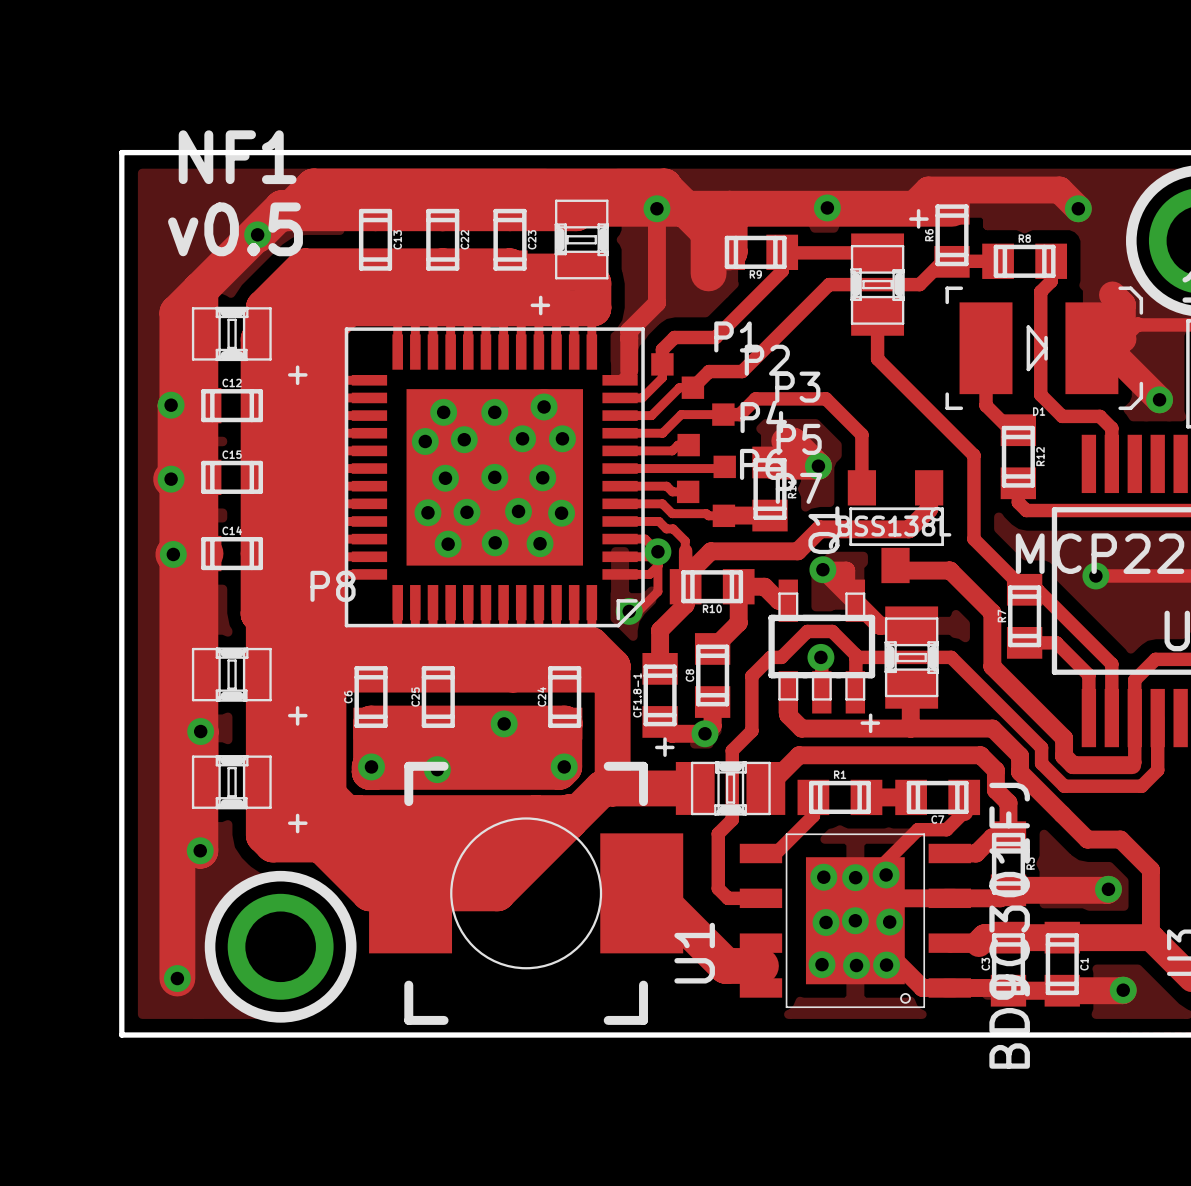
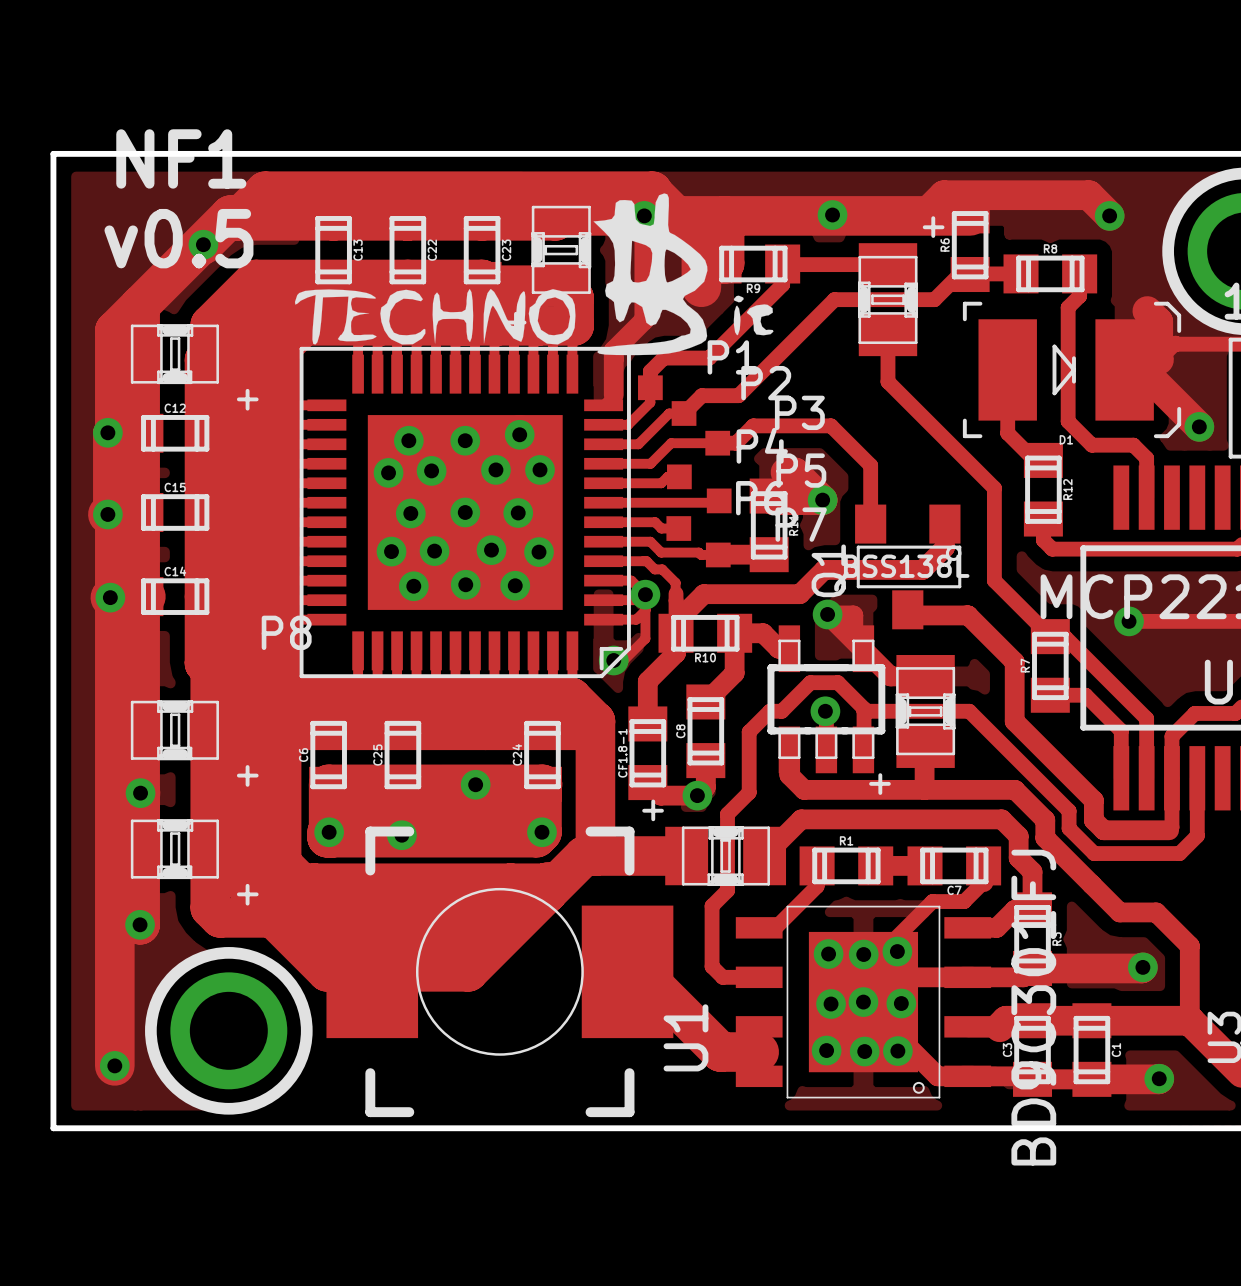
drawing: none -> [294, 193, 774, 356]

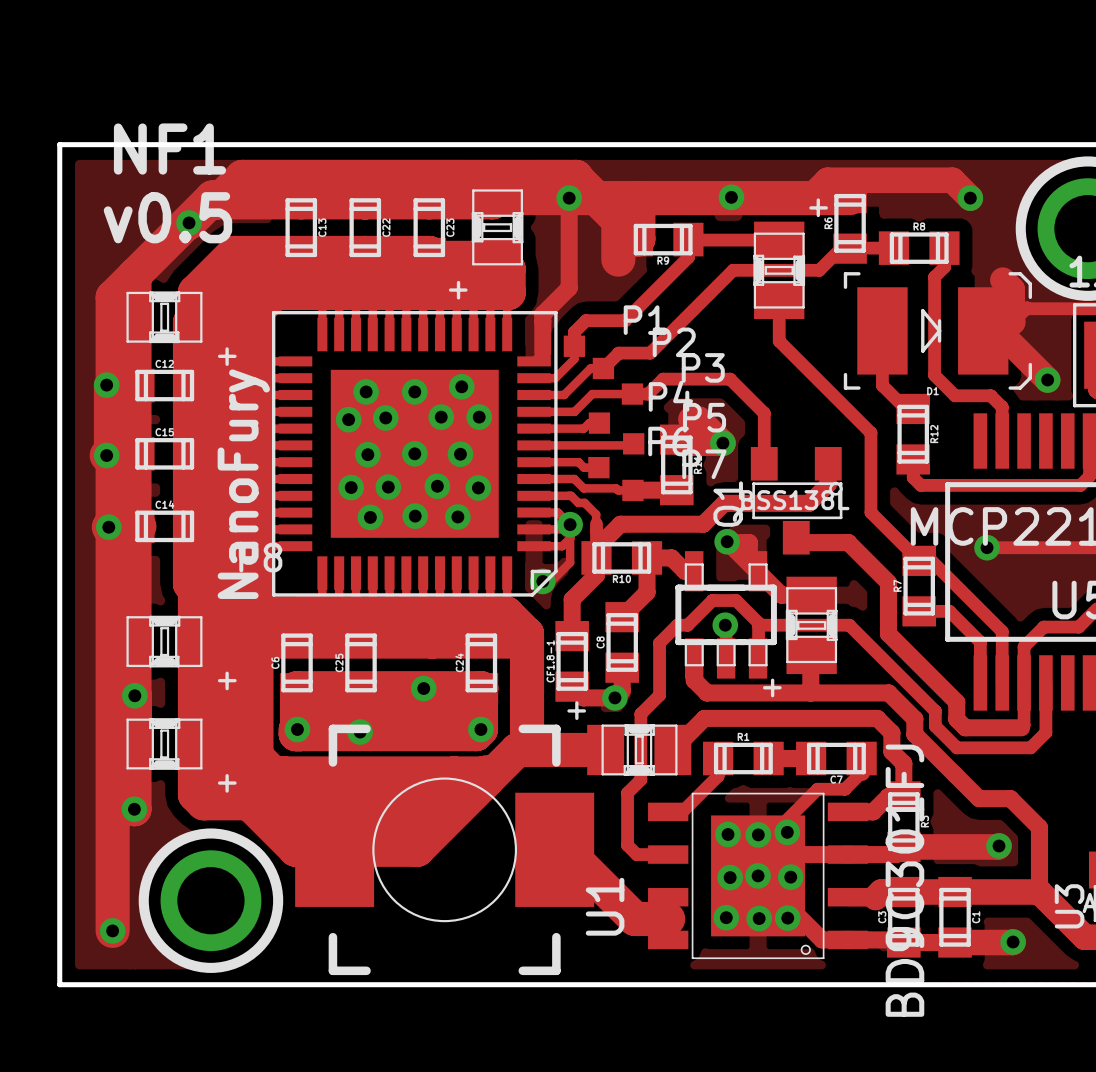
drawing: [294, 193, 774, 356] -> none
text: none -> NanoFury (243, 484)

